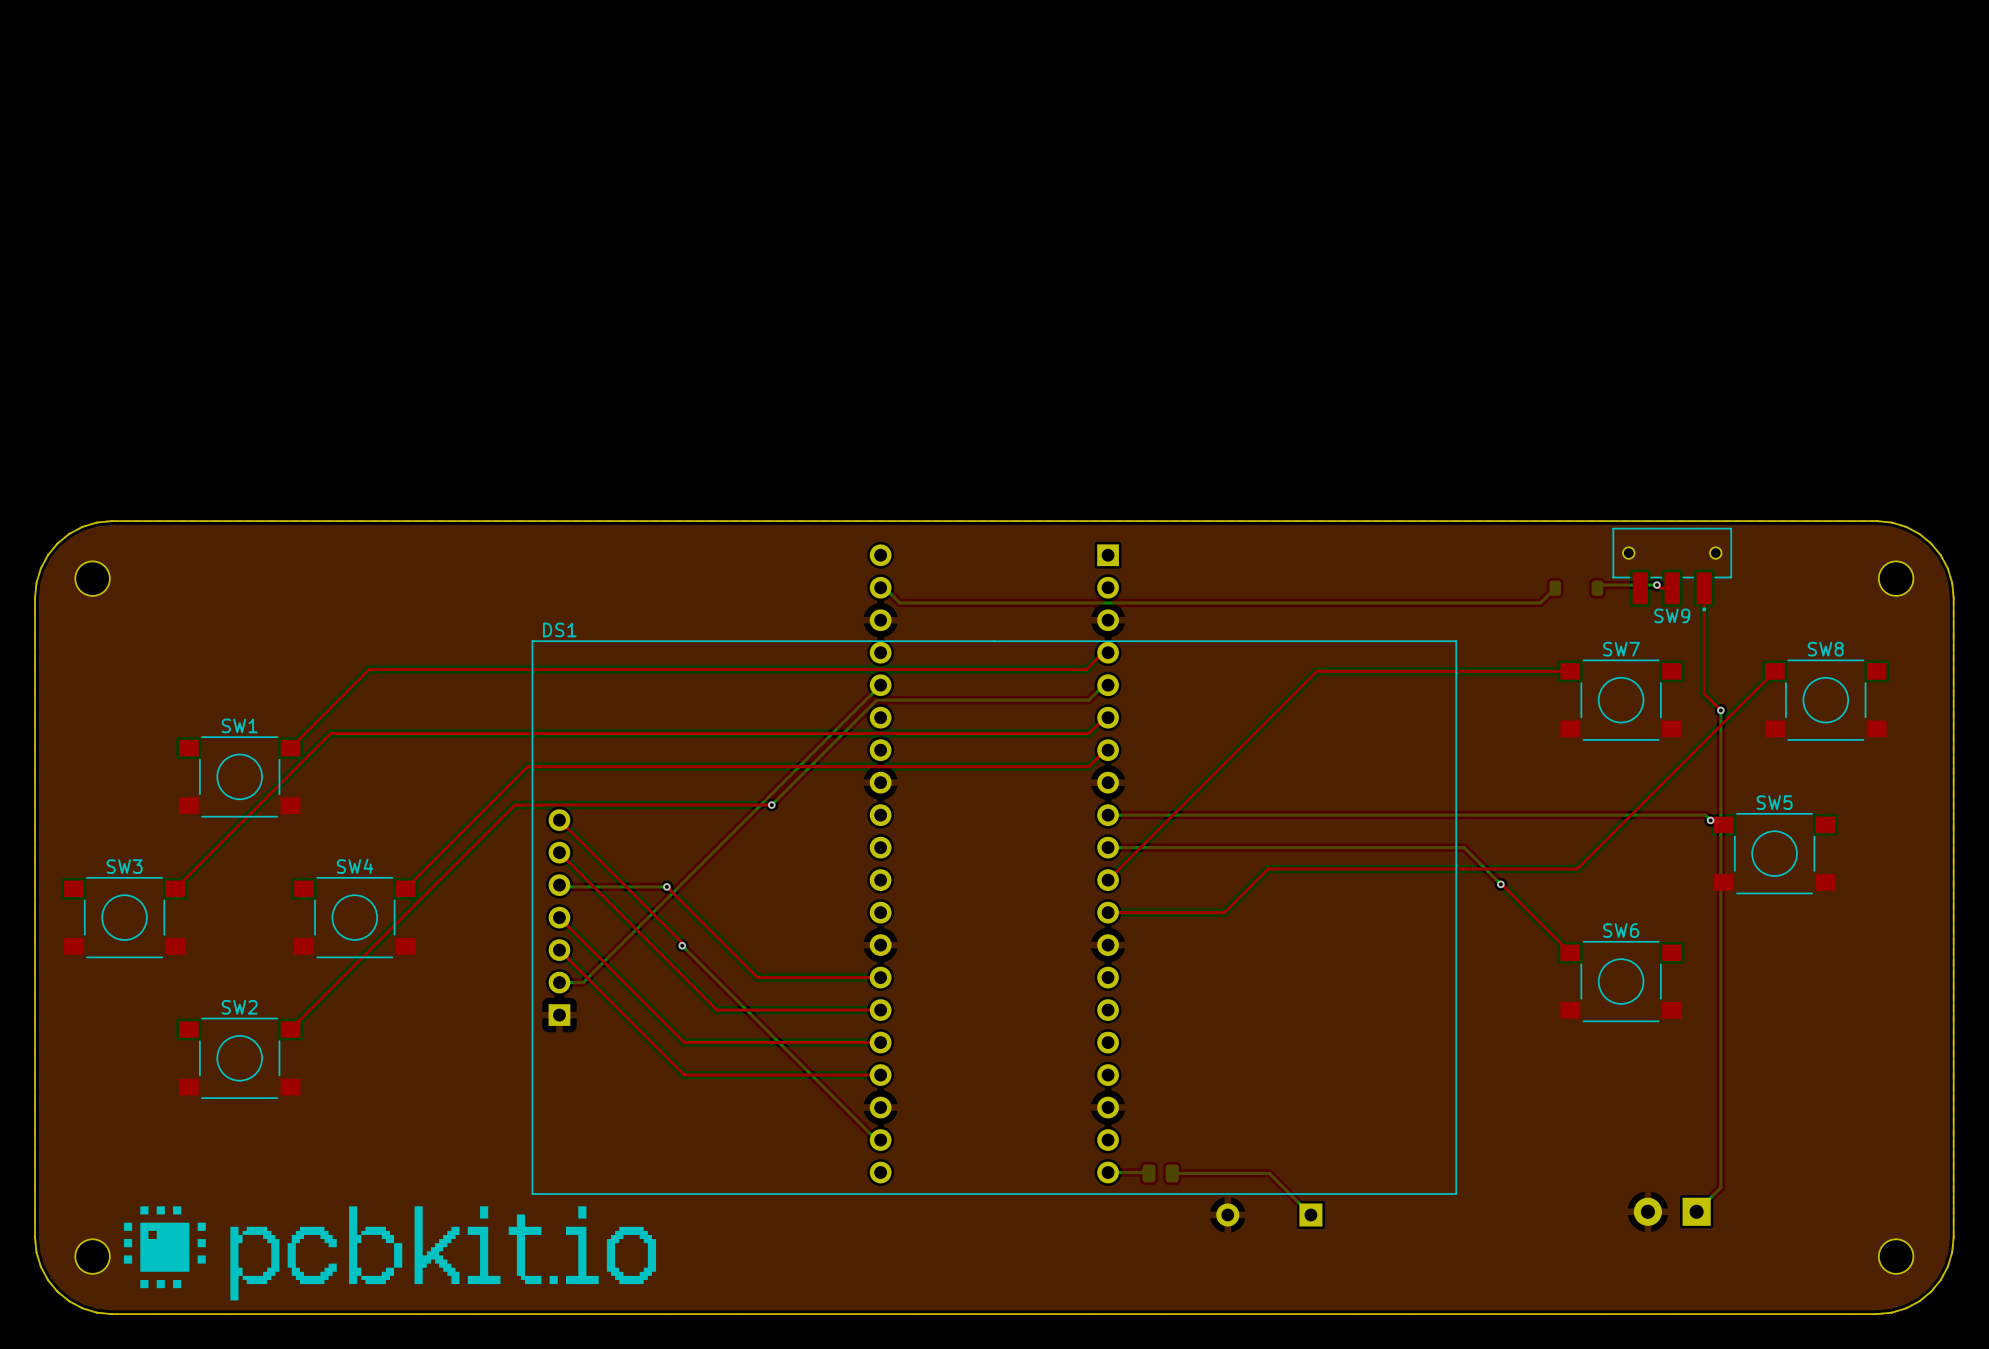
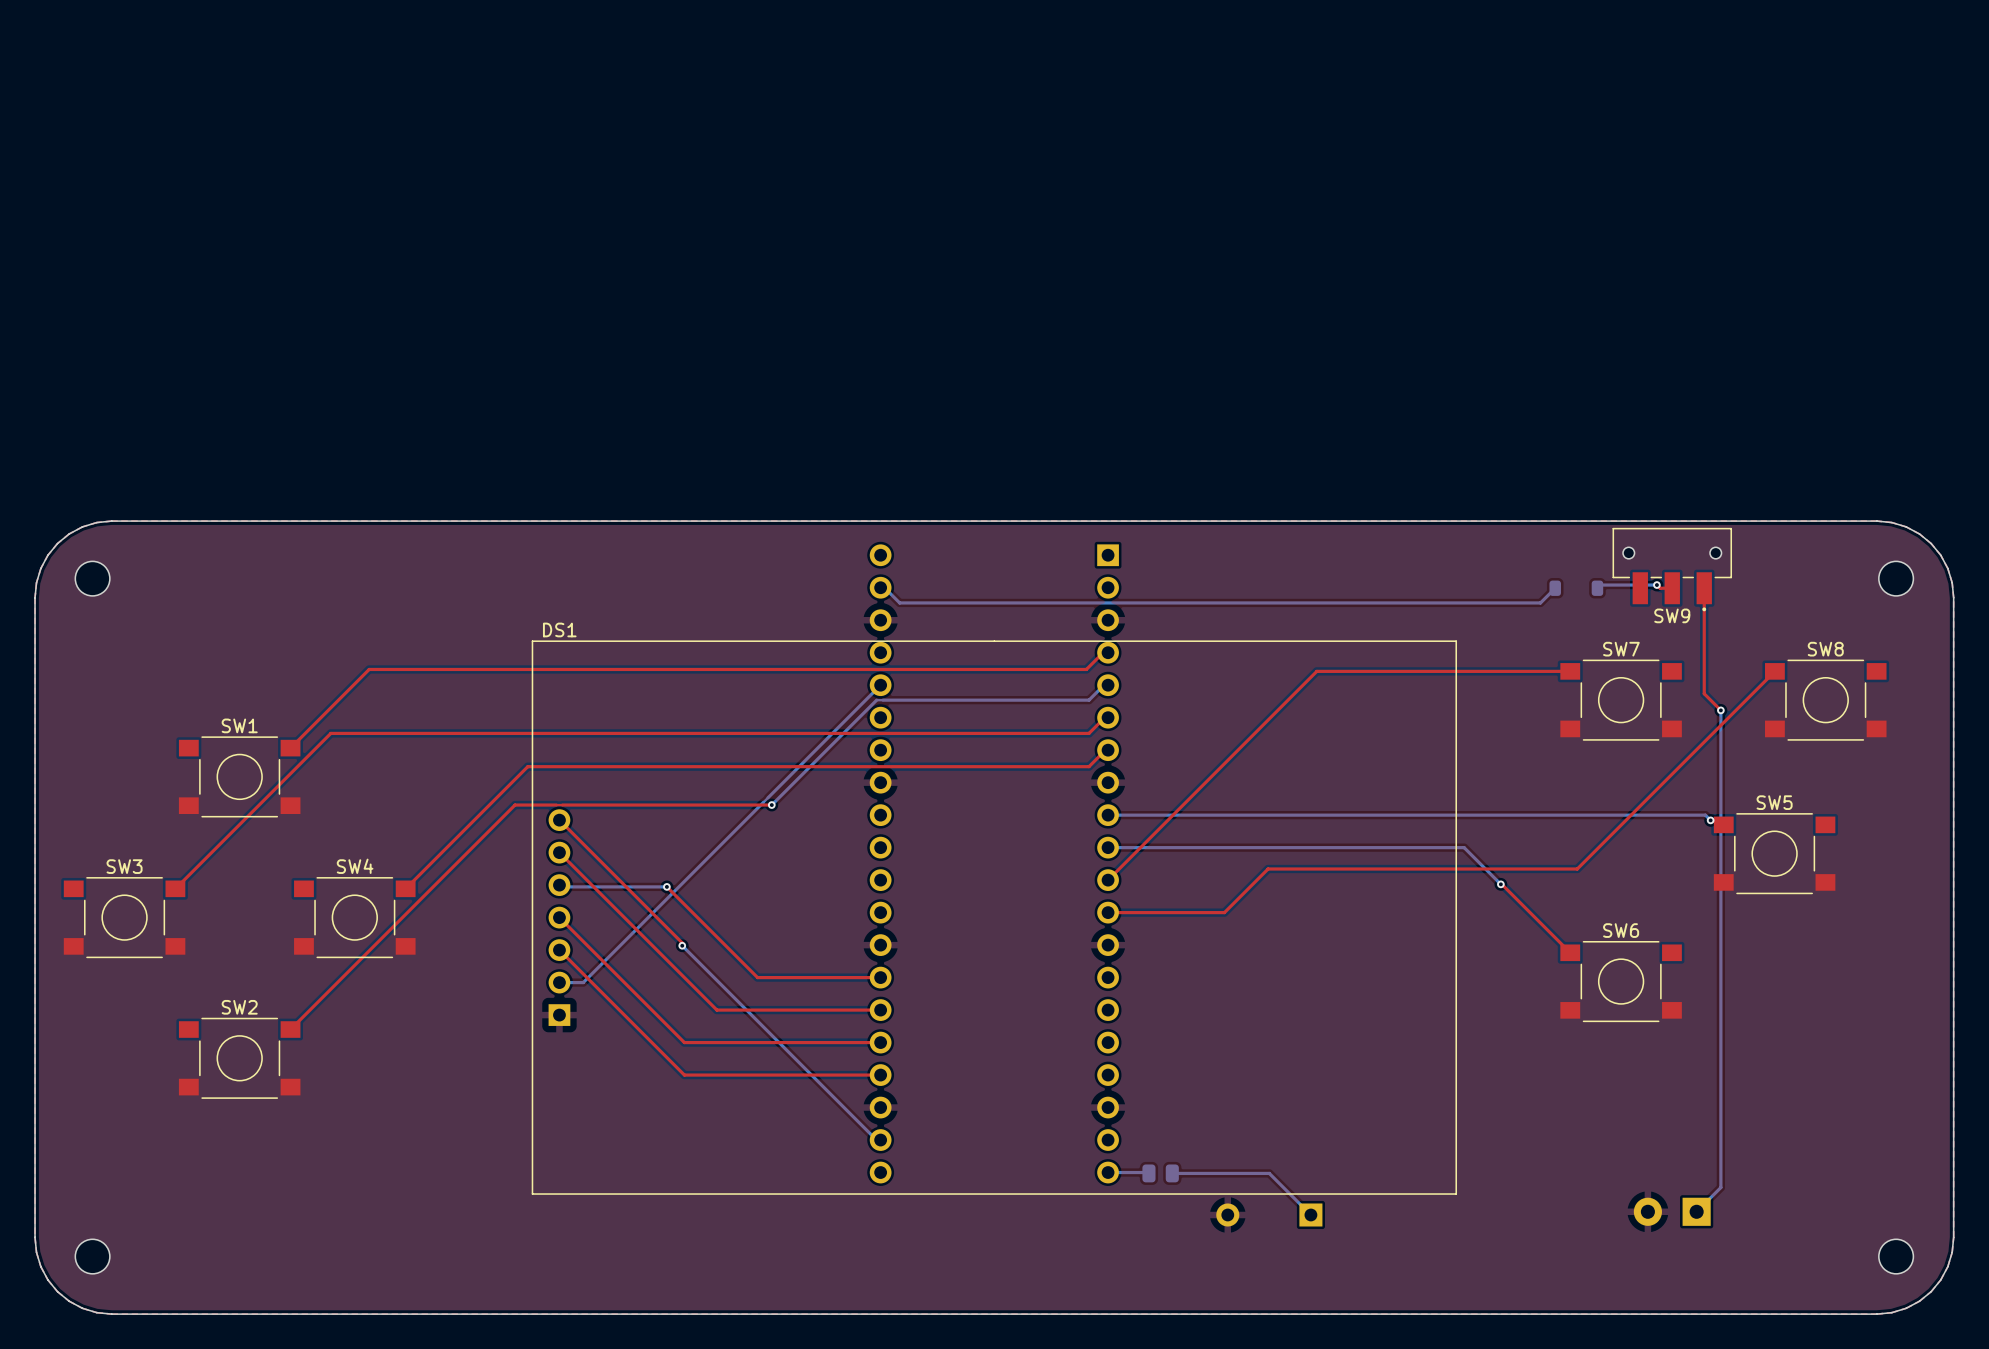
drawing: [123, 1206, 657, 1301] -> none

